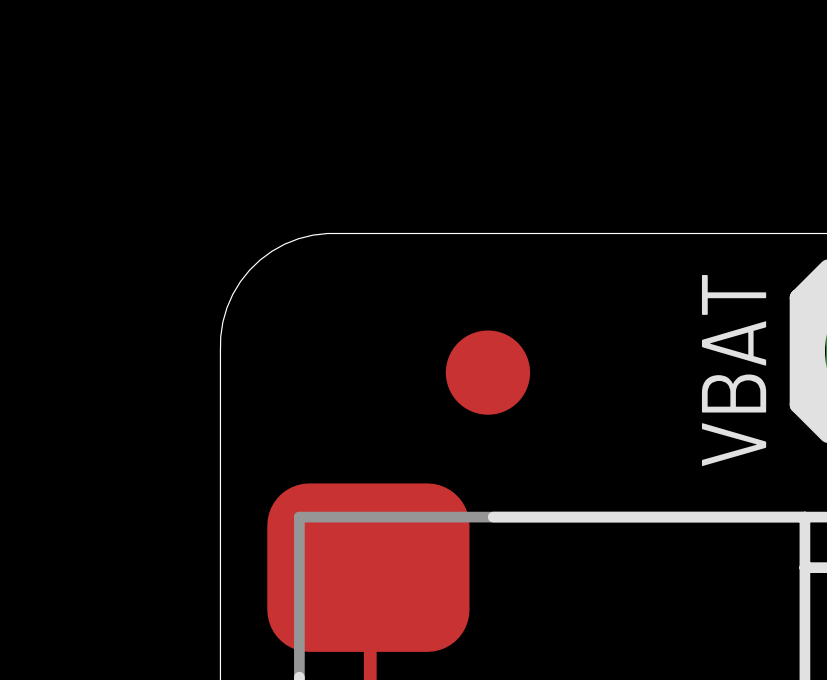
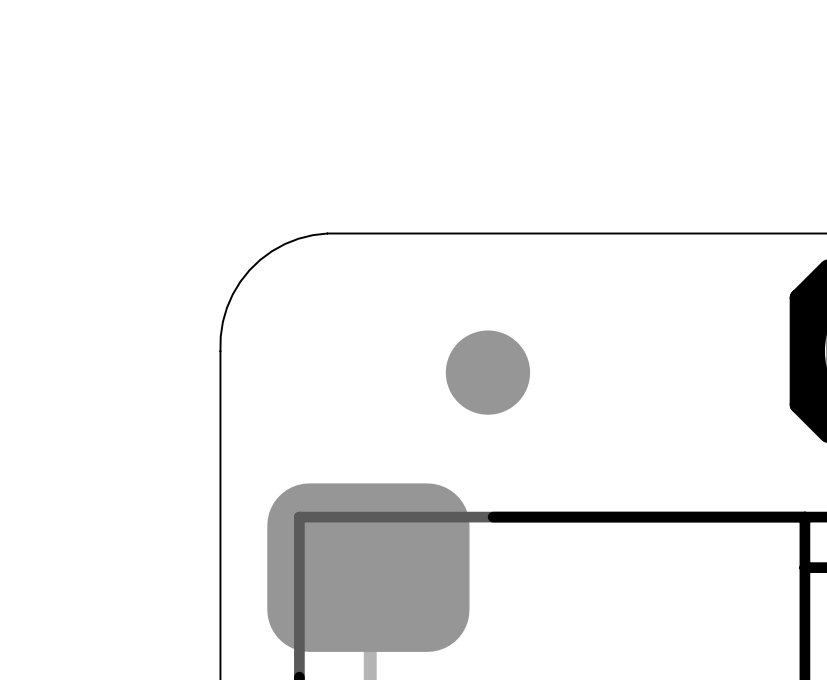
text: VBAT (734, 370) -> none

